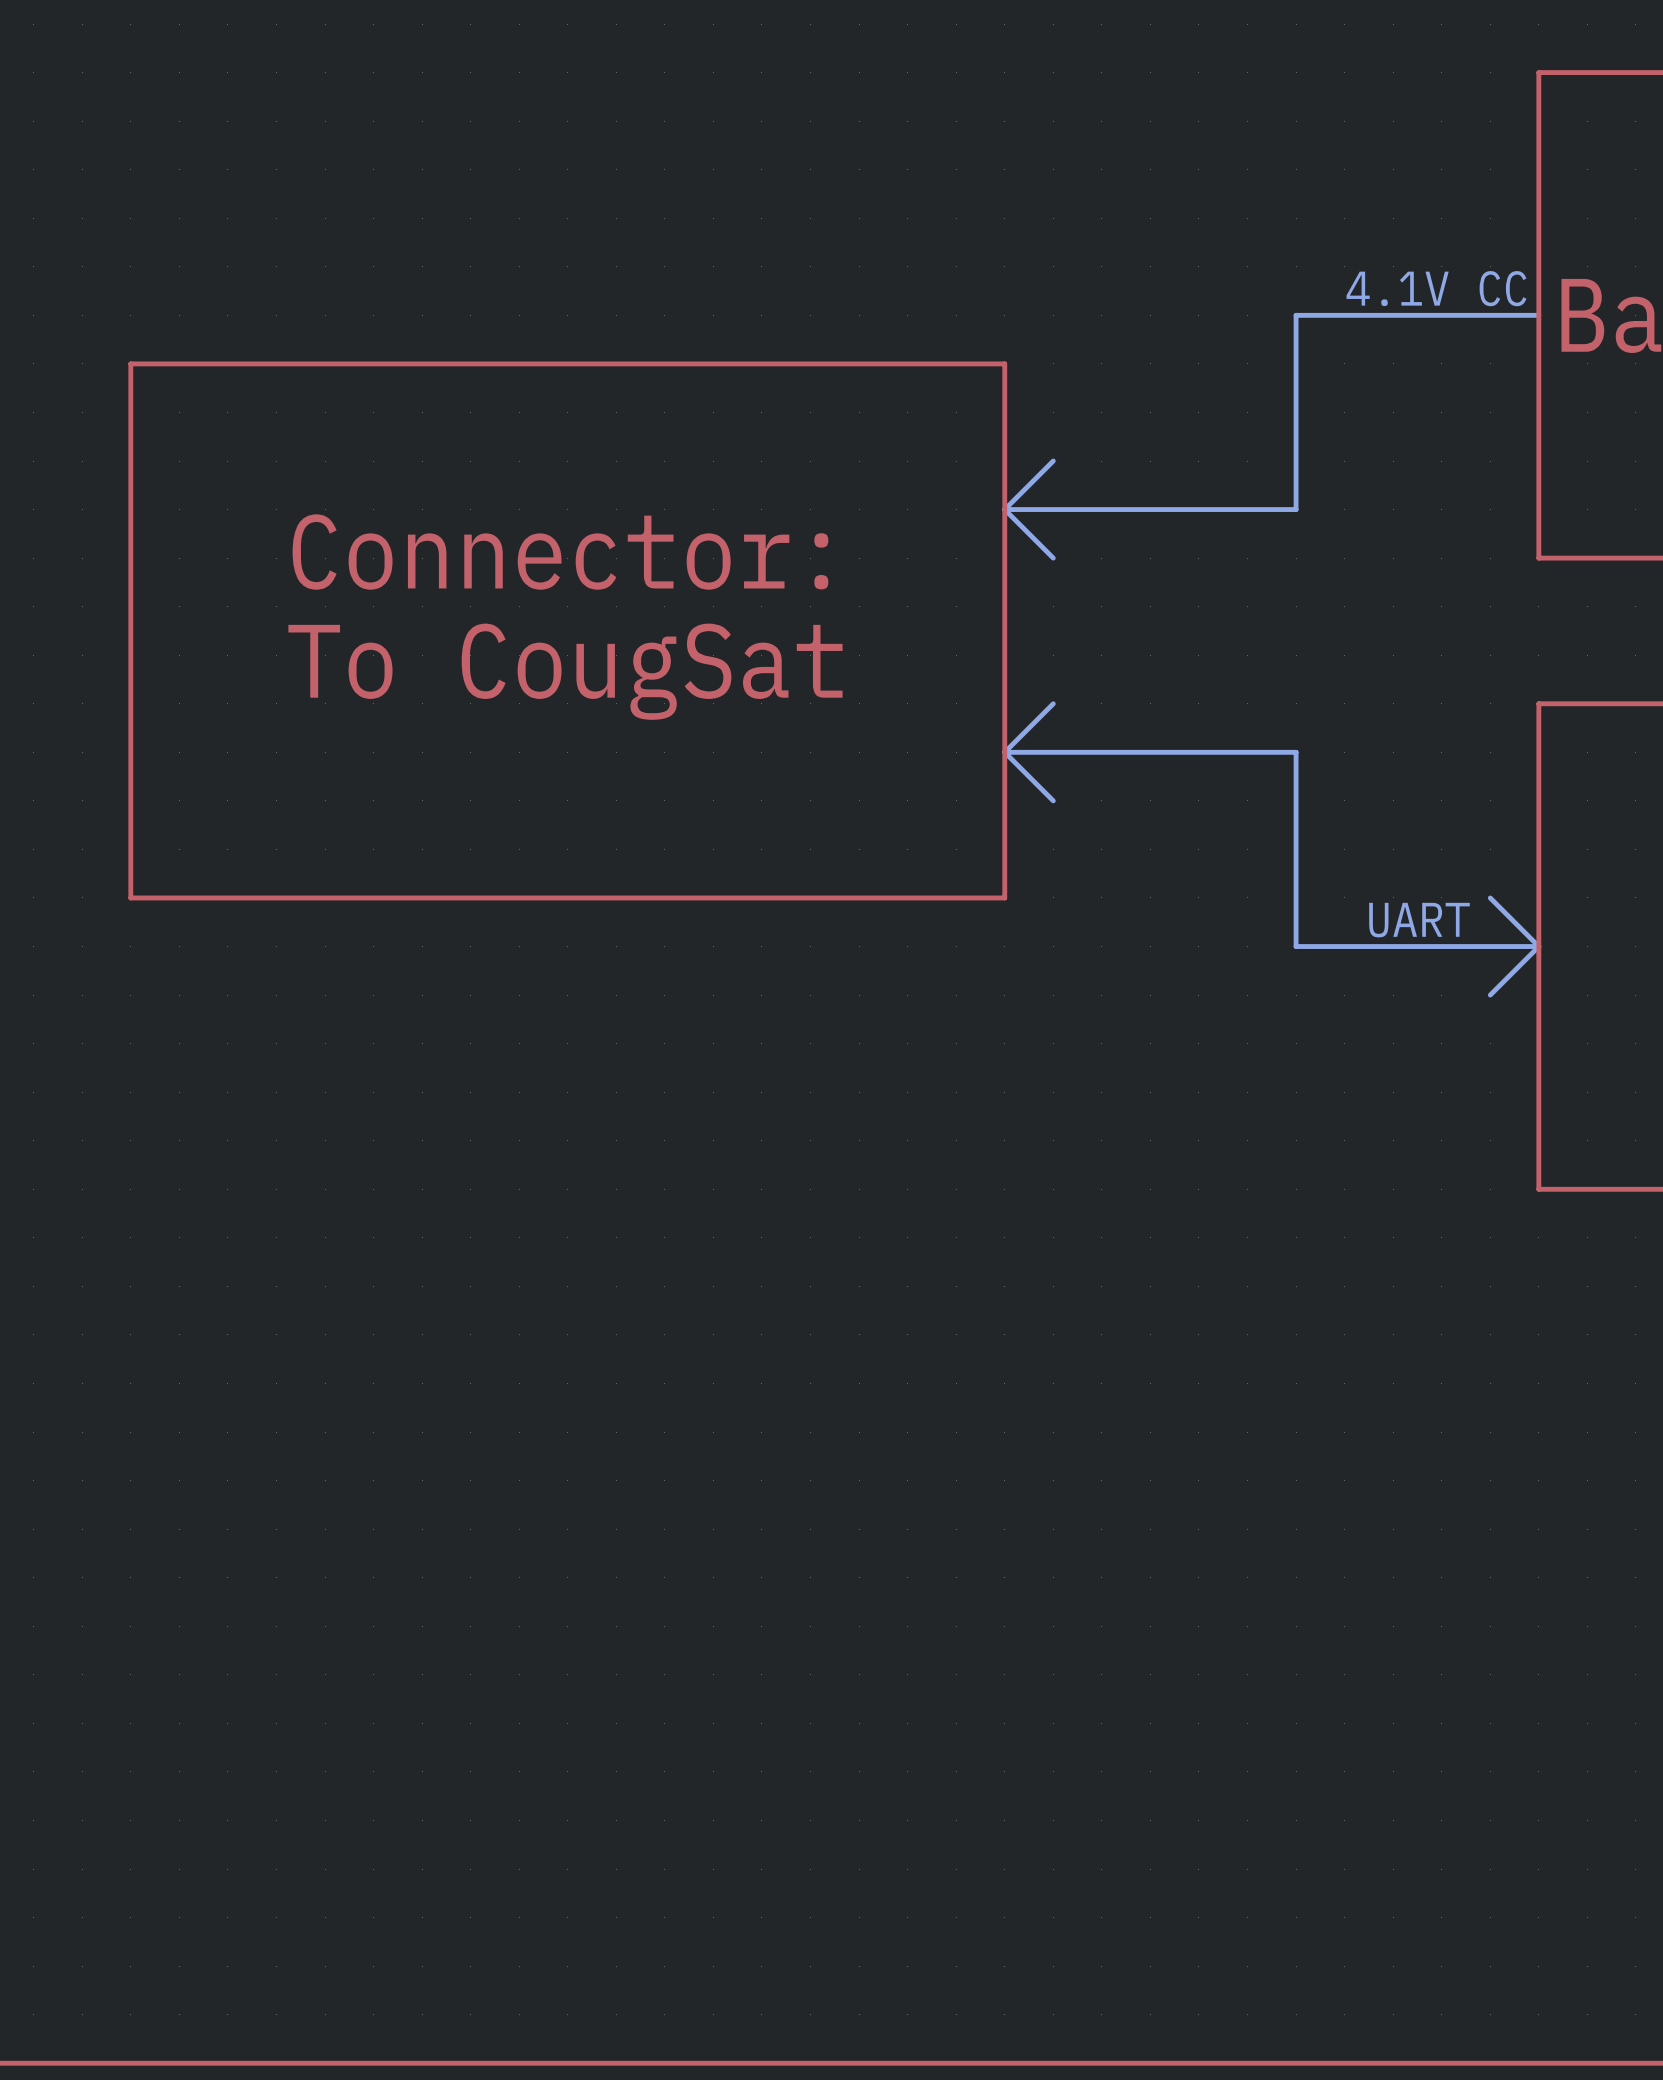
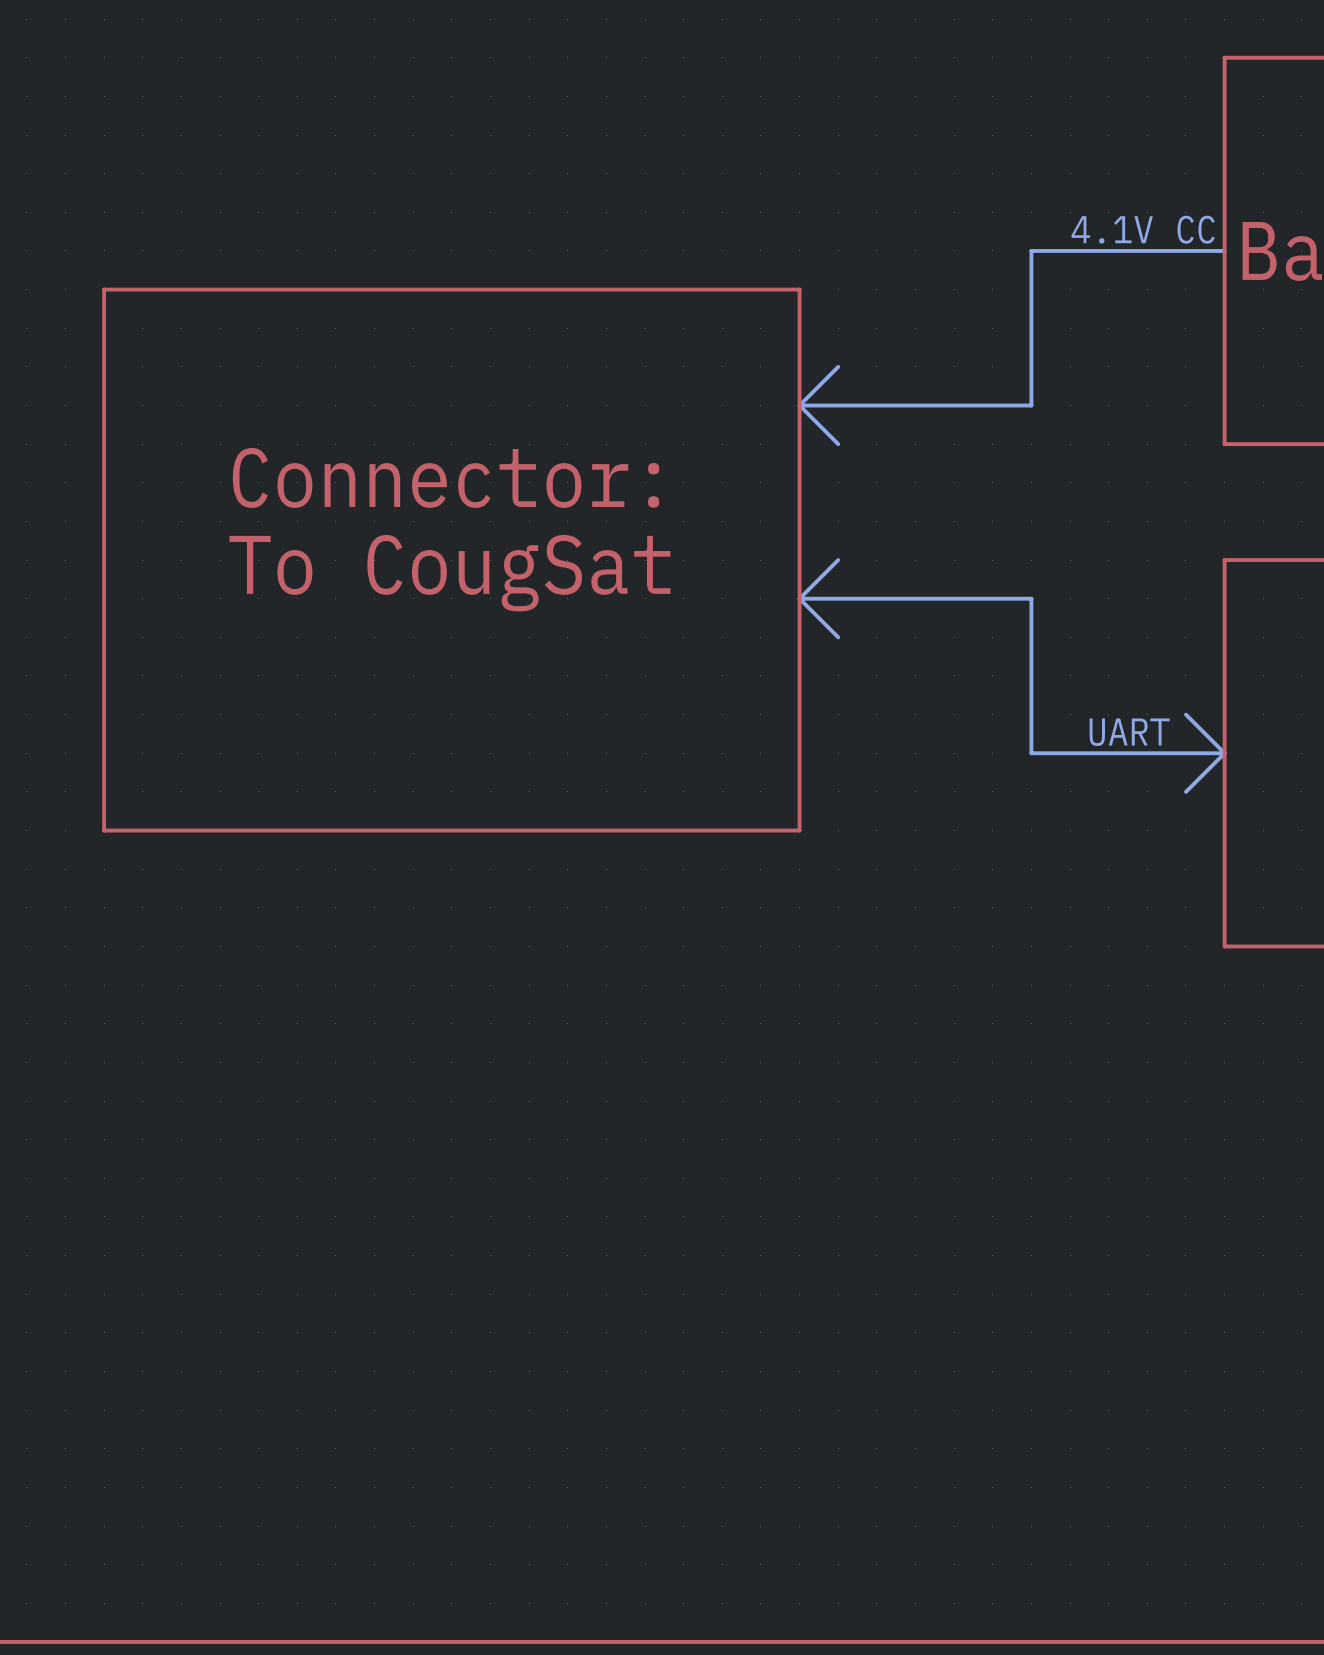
text position: Connector: (560, 552) -> Connector: (446, 477)
text position: To CougSat (565, 671) -> To CougSat (450, 573)
line: (130, 897) (1004, 897) -> (104, 714) (104, 830) (799, 830) (799, 714)

